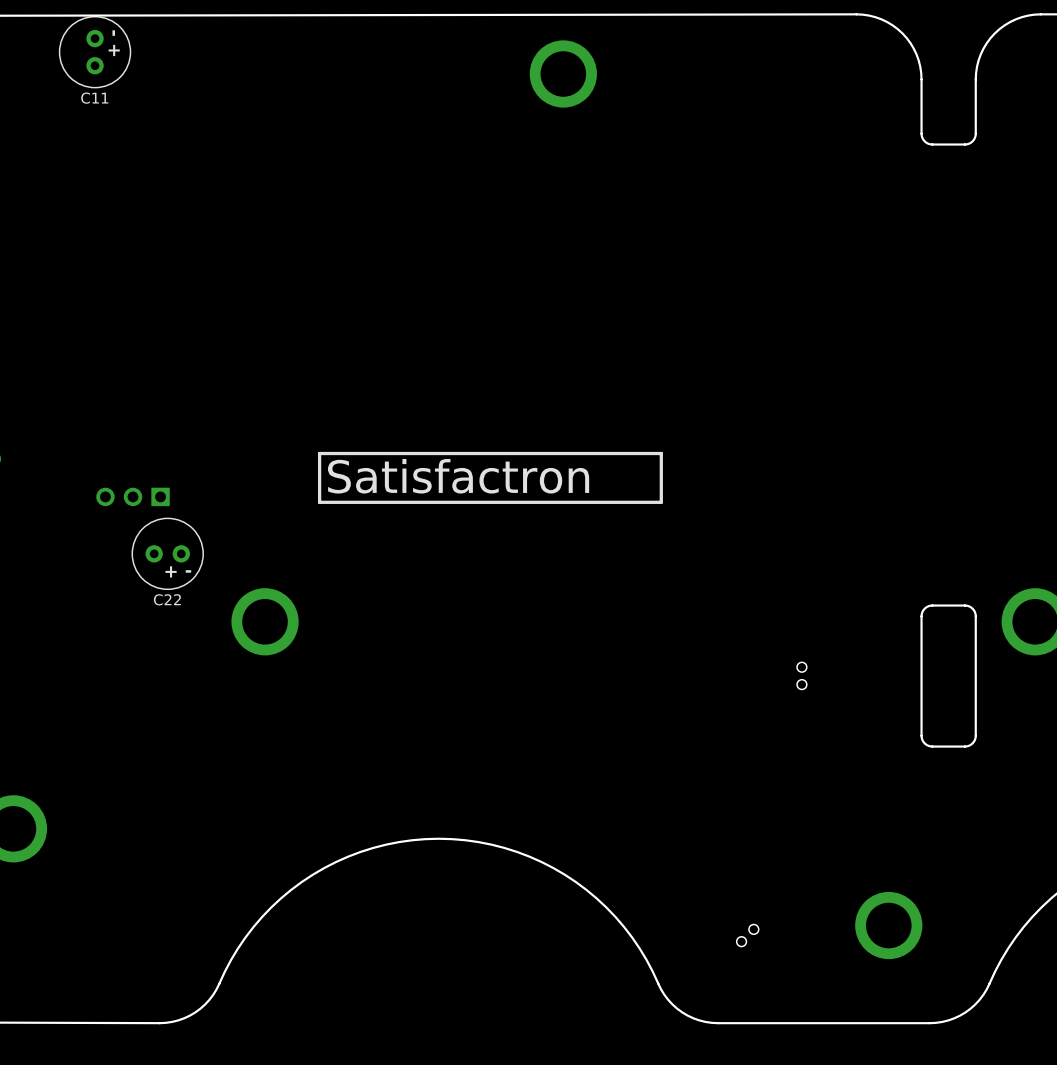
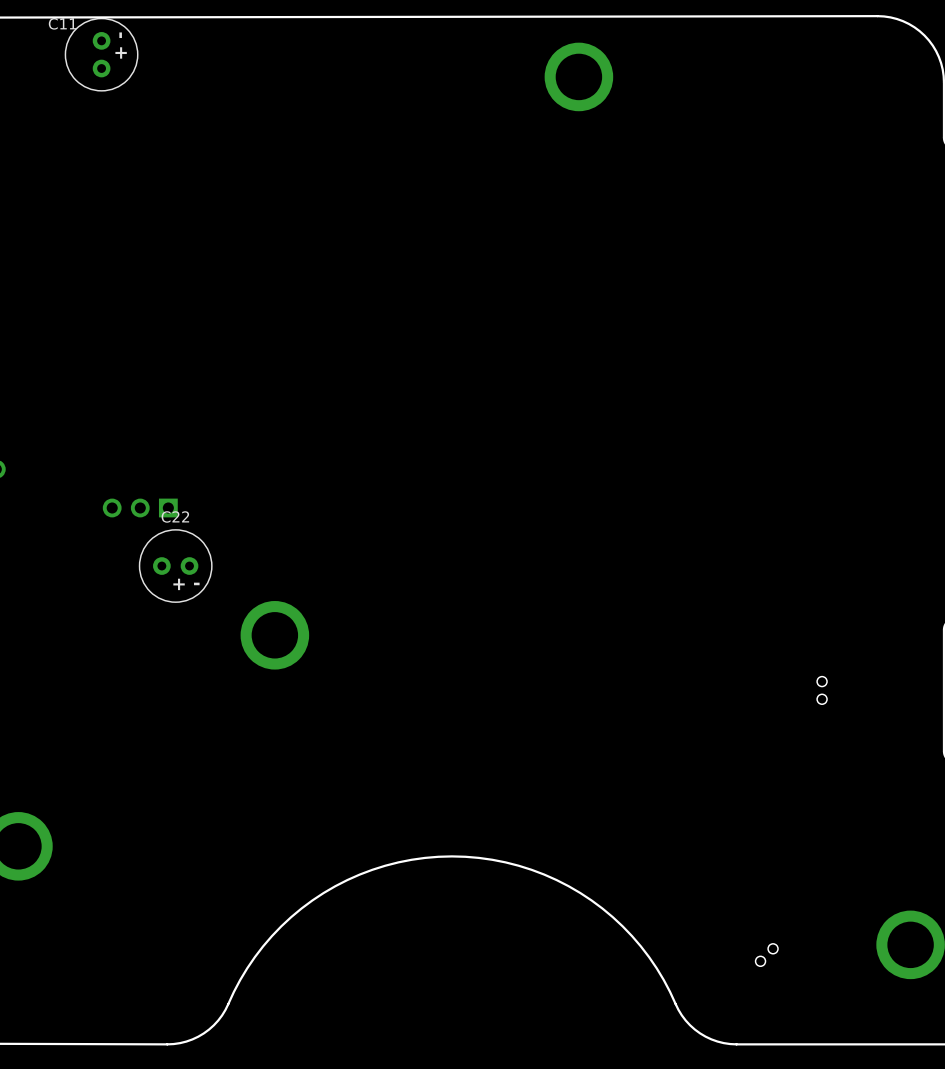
C11 name position: C11 (94, 98) -> C11 (62, 23)
line: (661, 453) (319, 453) (319, 502) (661, 502) (661, 453) -> none
text: Satisfactron (458, 476) -> none
C22 name position: C22 (167, 599) -> C22 (175, 516)

